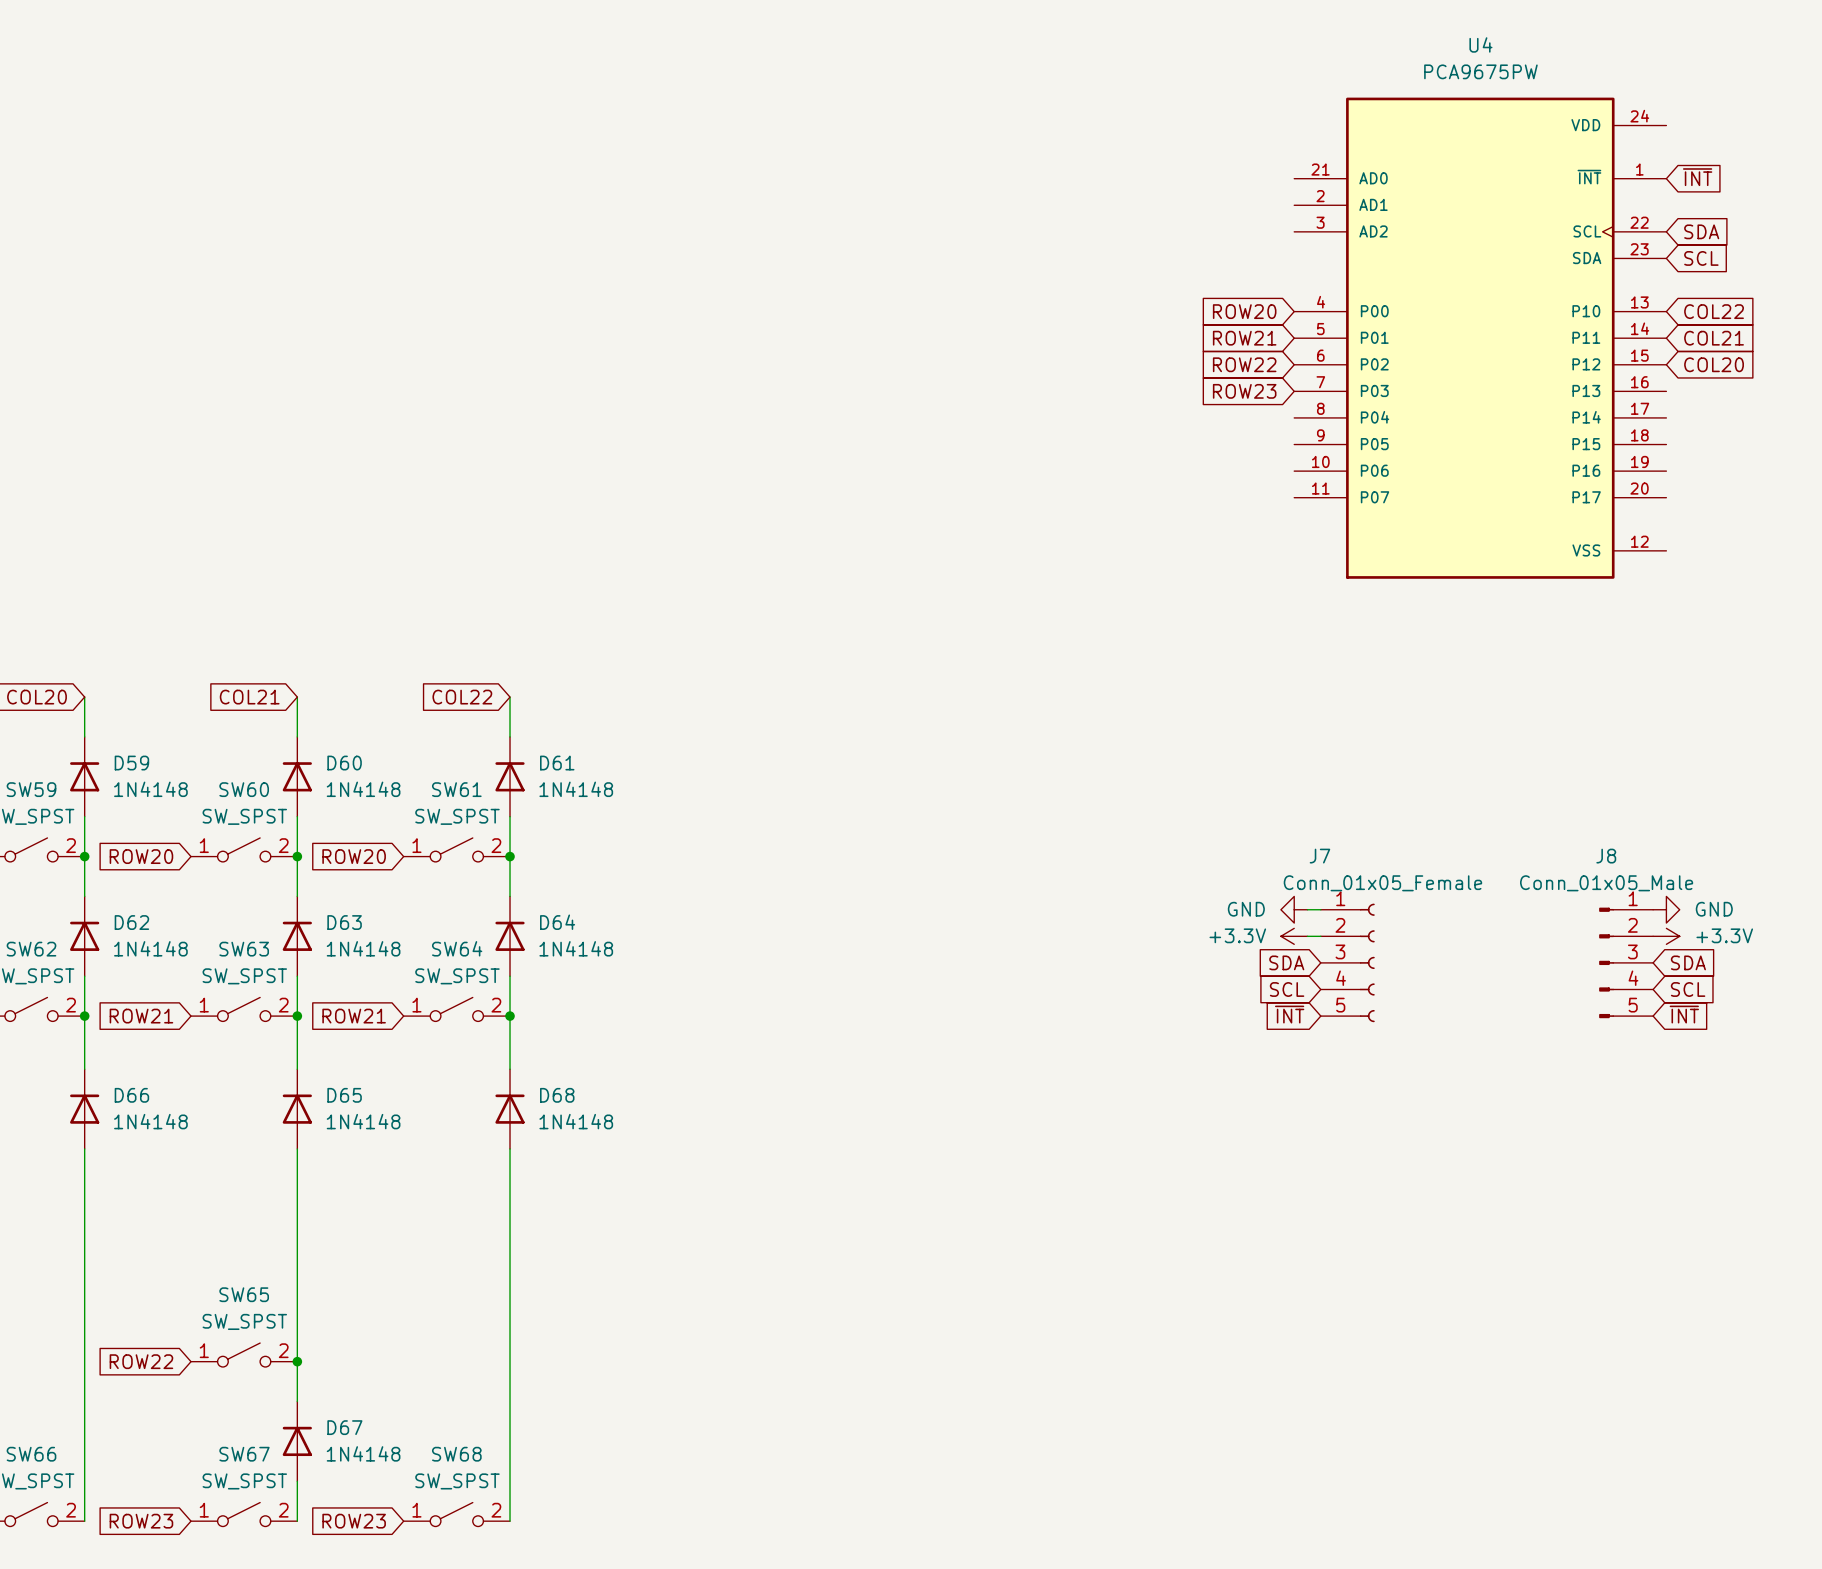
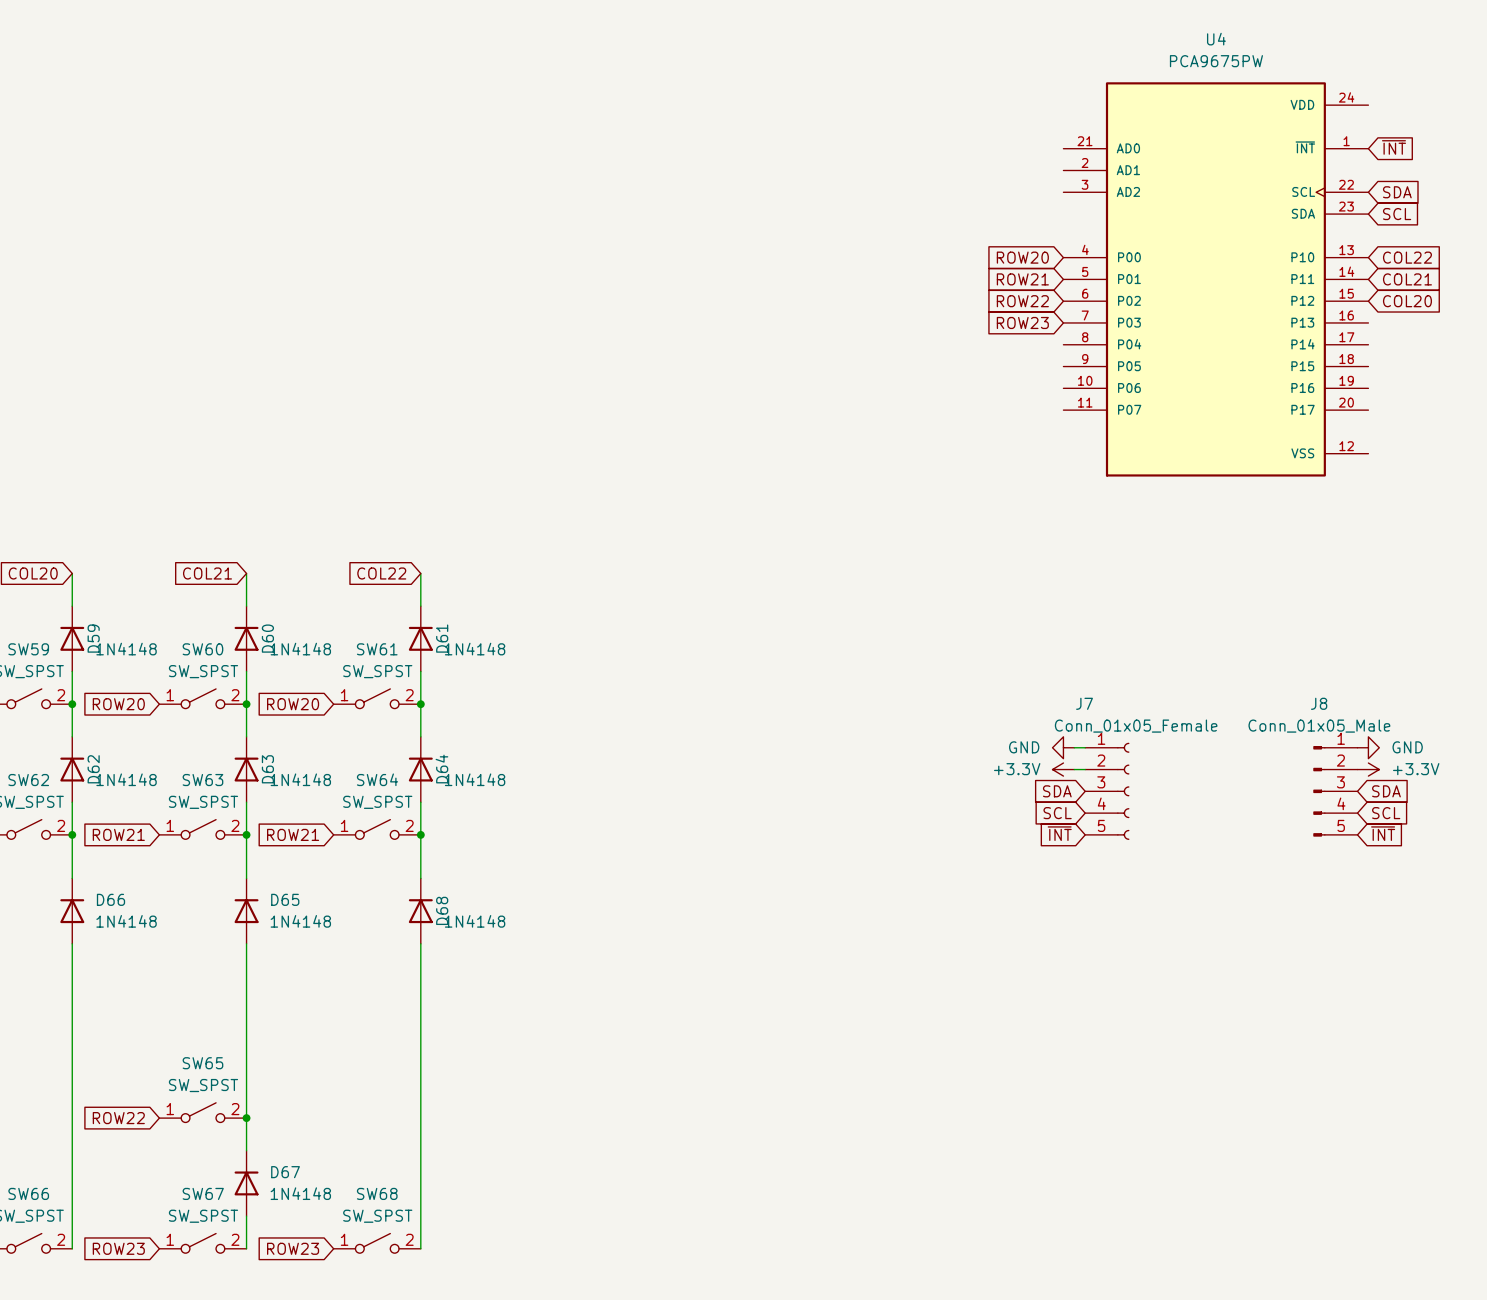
D59 name rotation: 0° (131, 763) -> 90° counterclockwise (93, 638)
D60 name rotation: 0° (344, 763) -> 90° counterclockwise (267, 638)
D61 name rotation: 0° (557, 763) -> 90° counterclockwise (442, 638)
D62 name rotation: 0° (131, 922) -> 90° counterclockwise (93, 769)
D63 name rotation: 0° (344, 922) -> 90° counterclockwise (267, 769)
D64 name rotation: 0° (557, 922) -> 90° counterclockwise (441, 769)
D68 name rotation: 0° (557, 1095) -> 90° counterclockwise (442, 910)

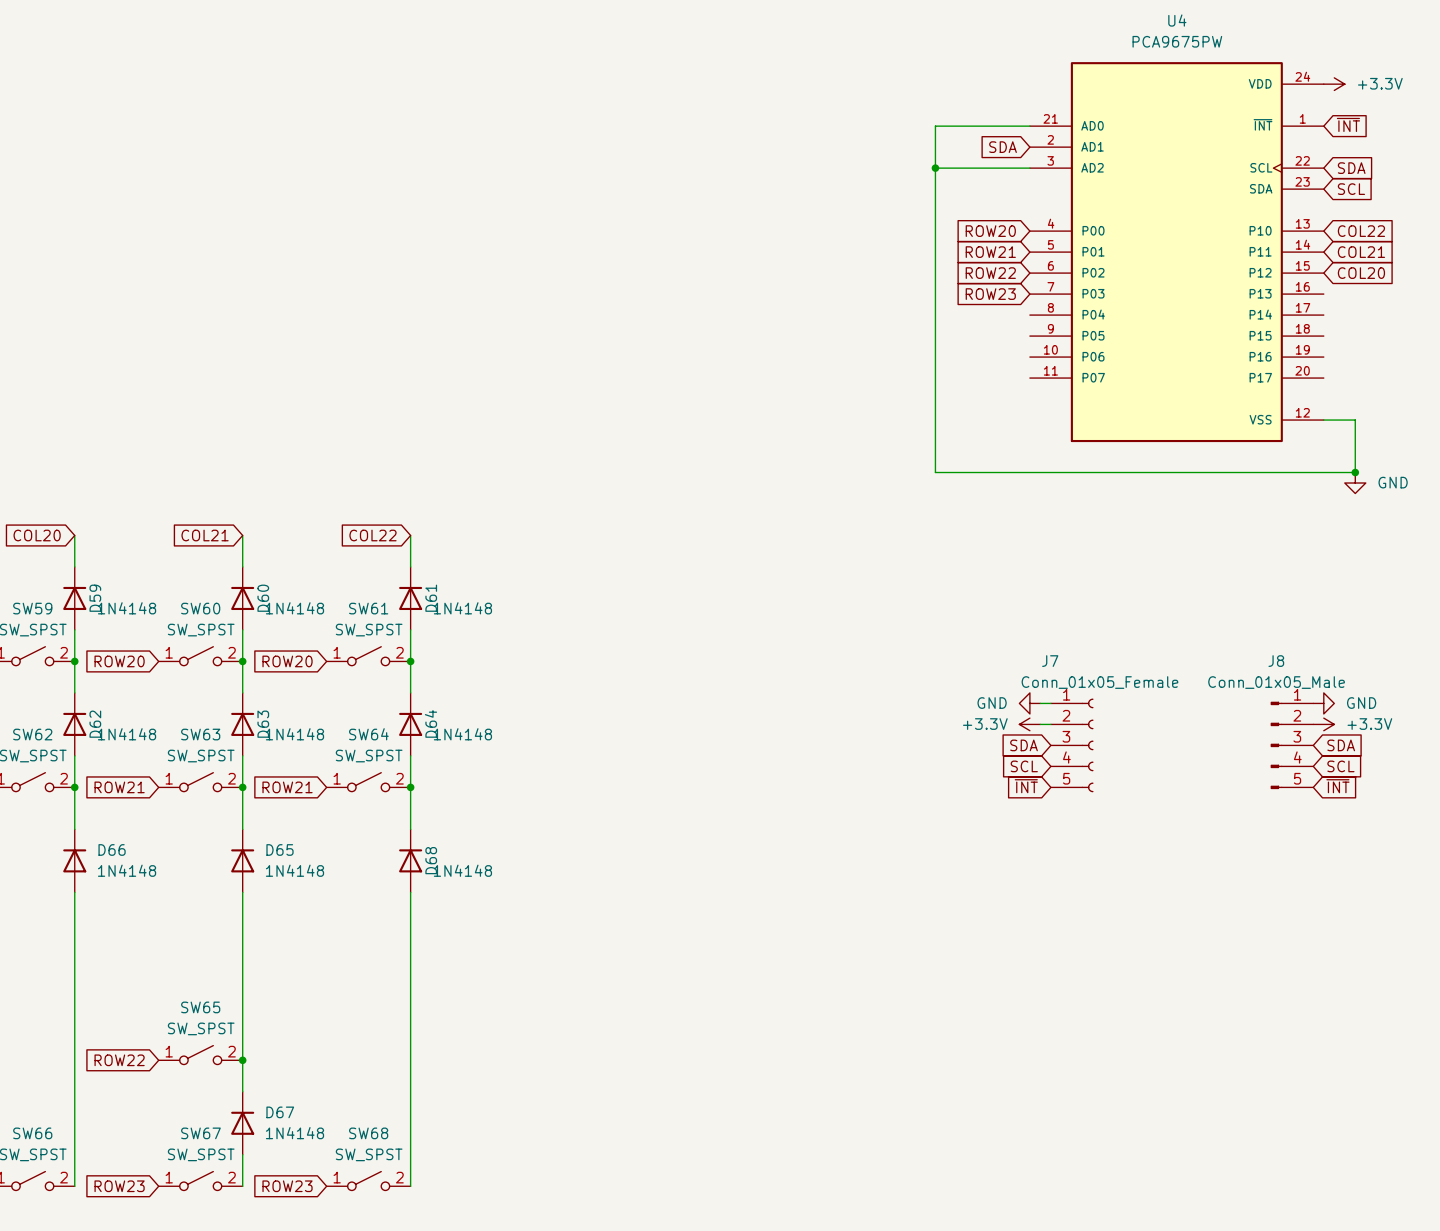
power symbol: none -> +3.3V (1334, 84)
wire: none -> (1029, 126) (935, 126) (935, 472) (1355, 472) (1355, 420) (1323, 420)
global label: none -> SDA (1003, 147)
wire: none -> (935, 168) (1029, 168)
junction: none -> (935, 168)
junction: none -> (1355, 472)
power symbol: none -> GND (1355, 483)

